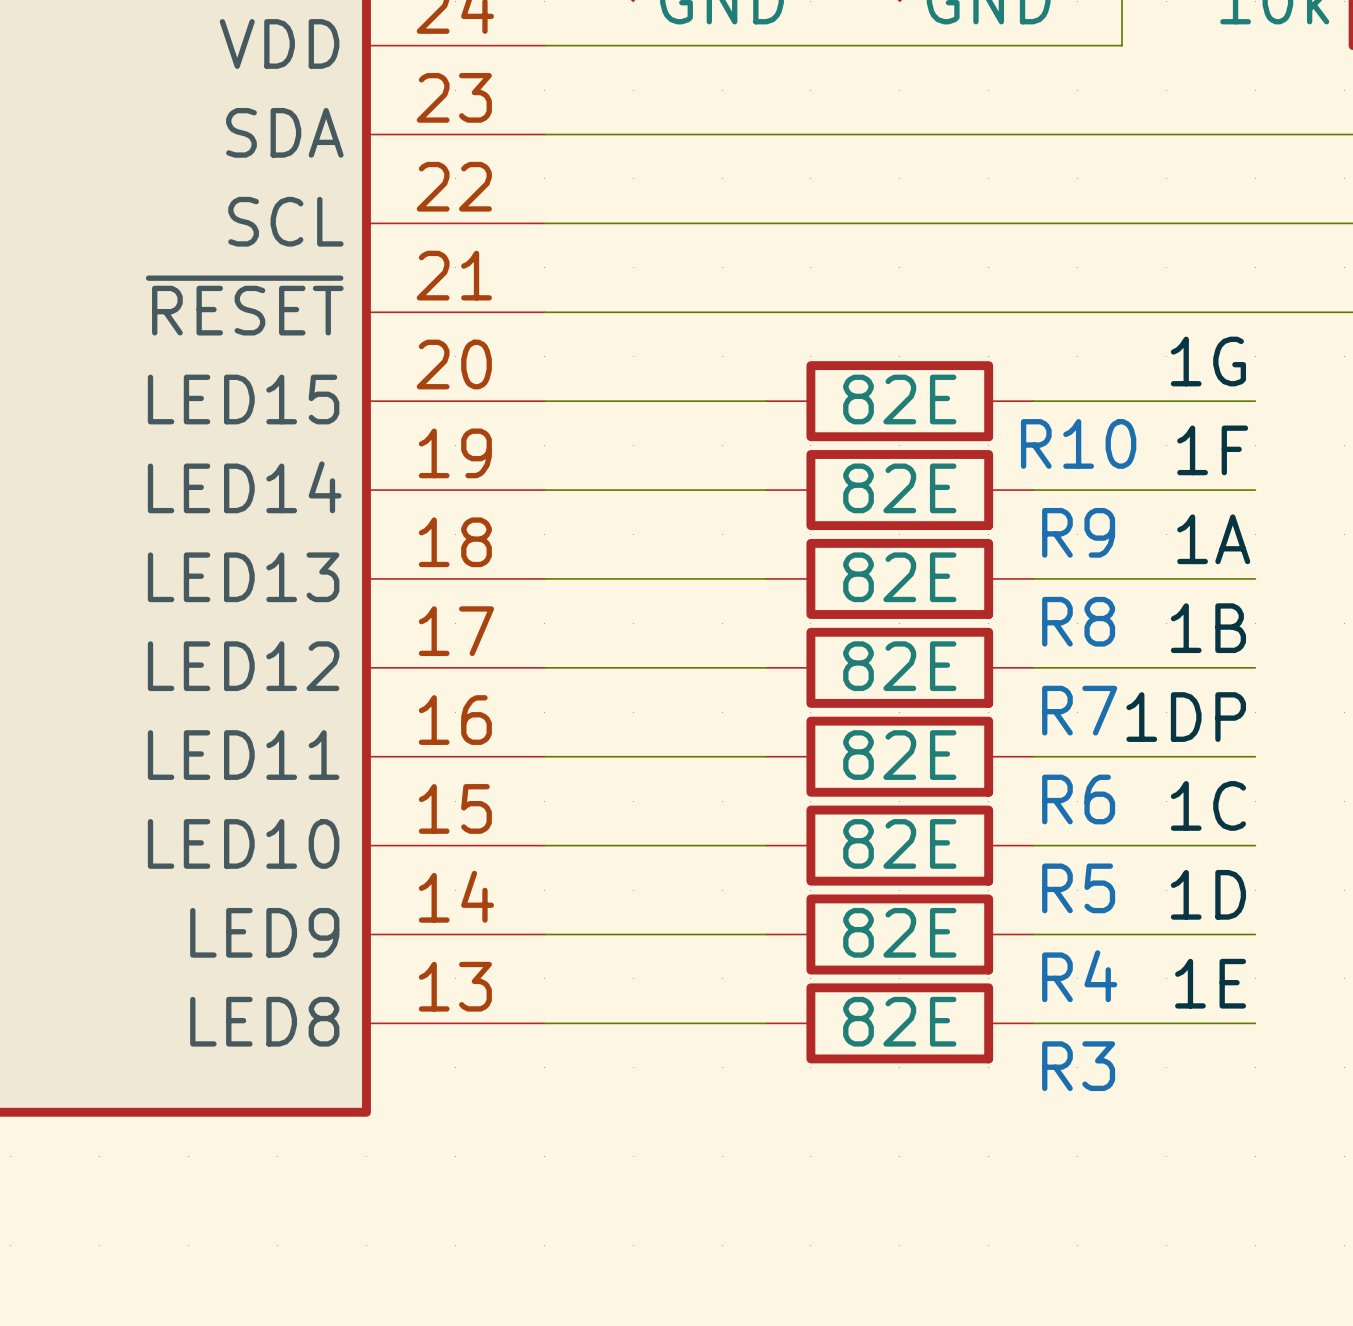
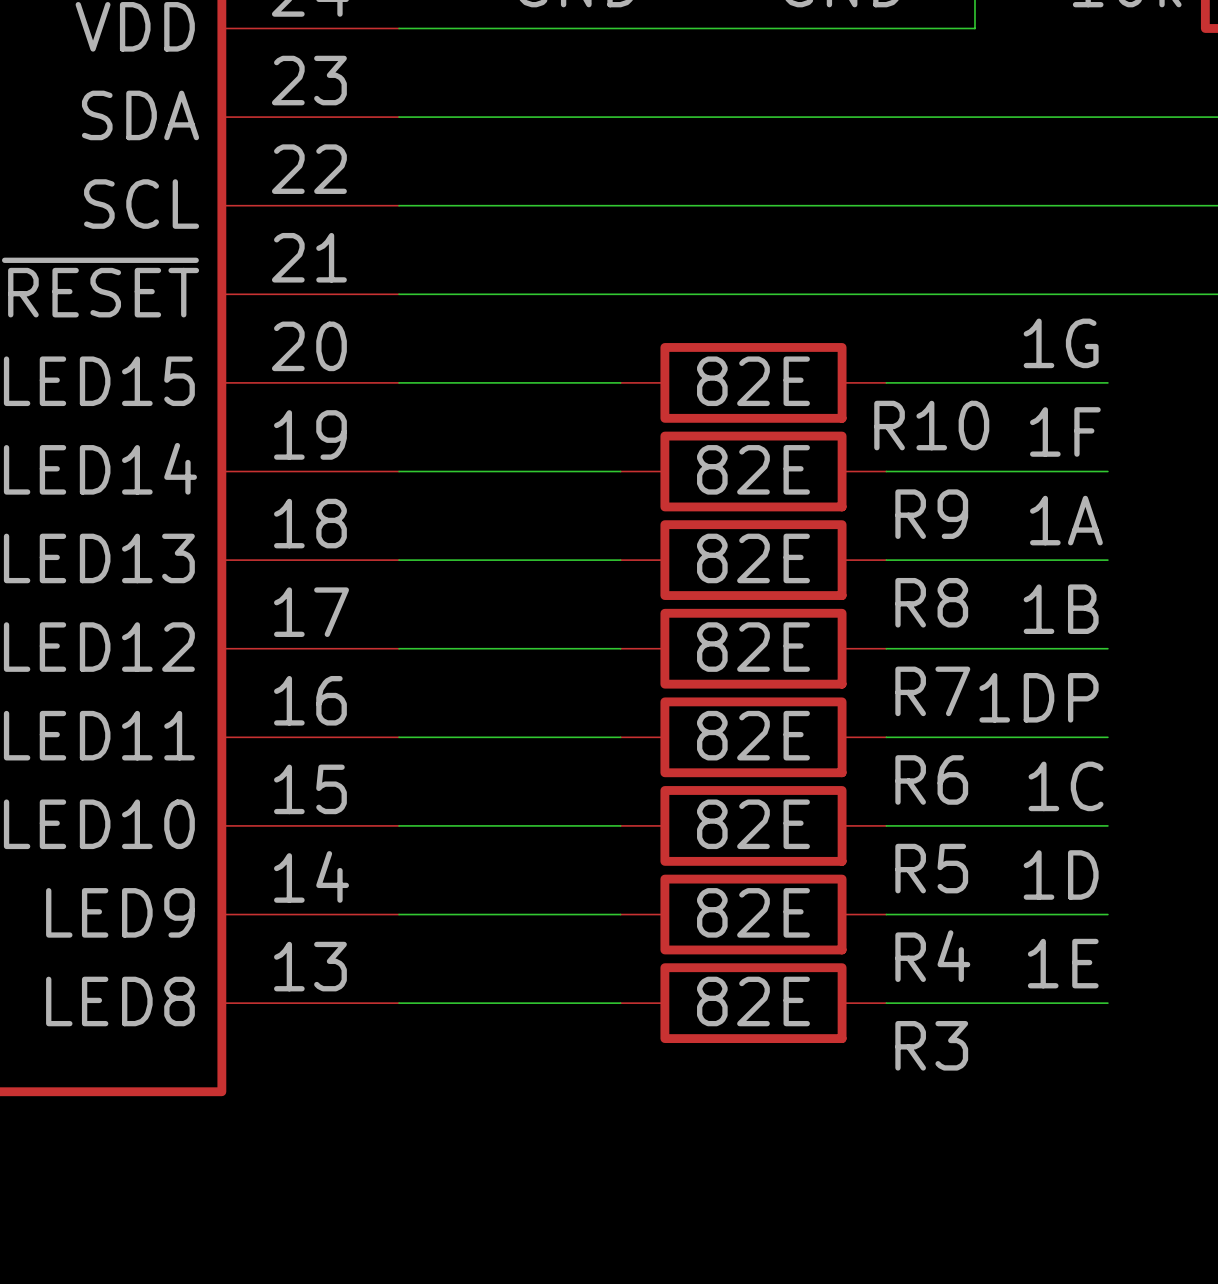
label position: 1C (1208, 805) -> 1C (1066, 786)

